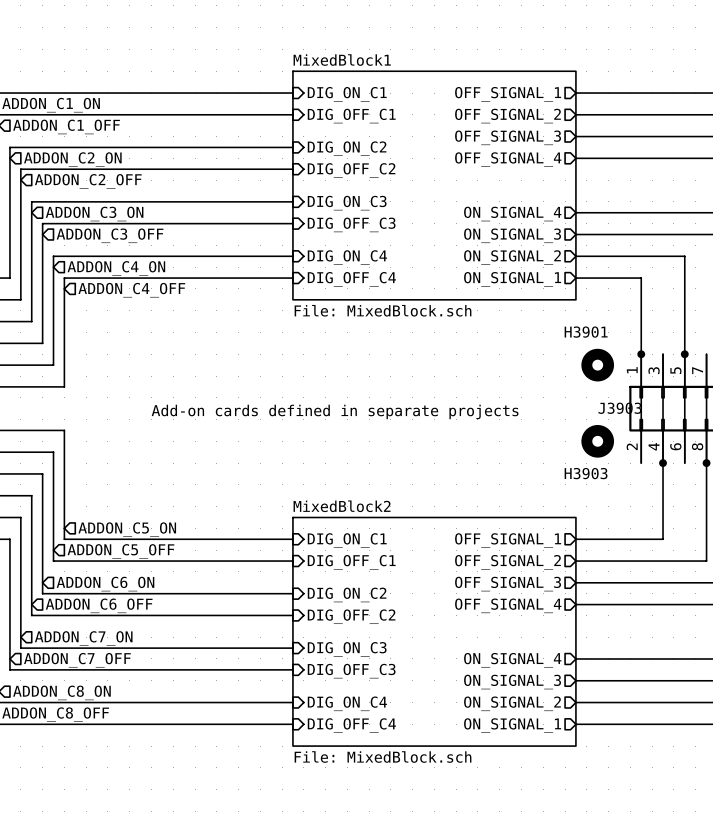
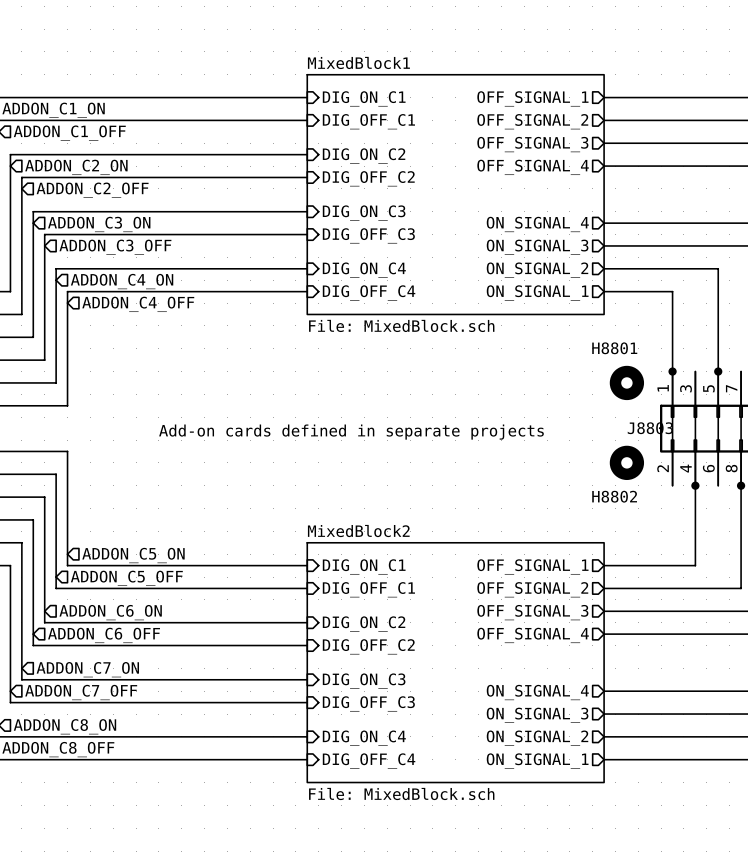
H3901 name: H3901 (586, 332) -> H8801 (614, 348)
J3903 name: J3903 (620, 408) -> J8803 (650, 428)
H3903 name: H3903 (586, 473) -> H8802 (614, 496)

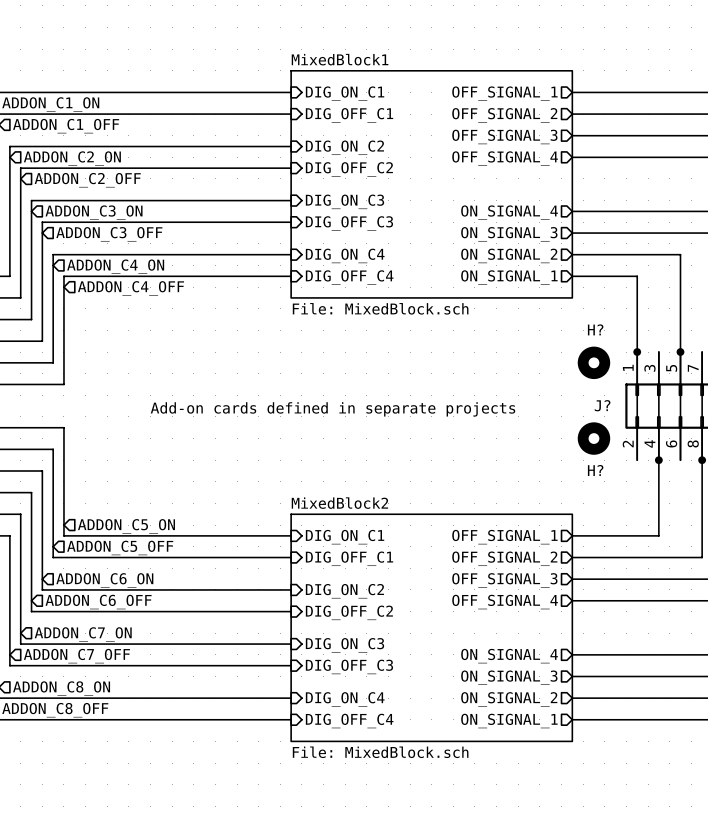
H8801 name: H8801 (614, 348) -> H? (595, 329)
J8803 name: J8803 (650, 428) -> J? (602, 405)
H8802 name: H8802 (614, 496) -> H? (595, 470)

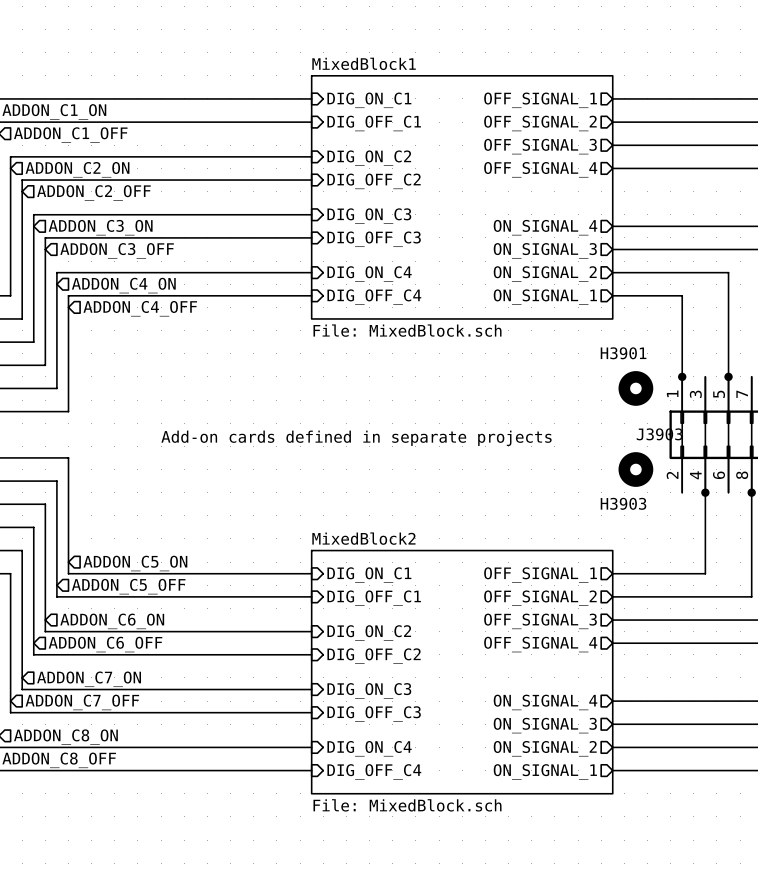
H? name: H? (595, 329) -> H3901 (623, 353)
J? name: J? (602, 405) -> J3903 (659, 434)
H? name: H? (595, 470) -> H3903 (623, 503)

